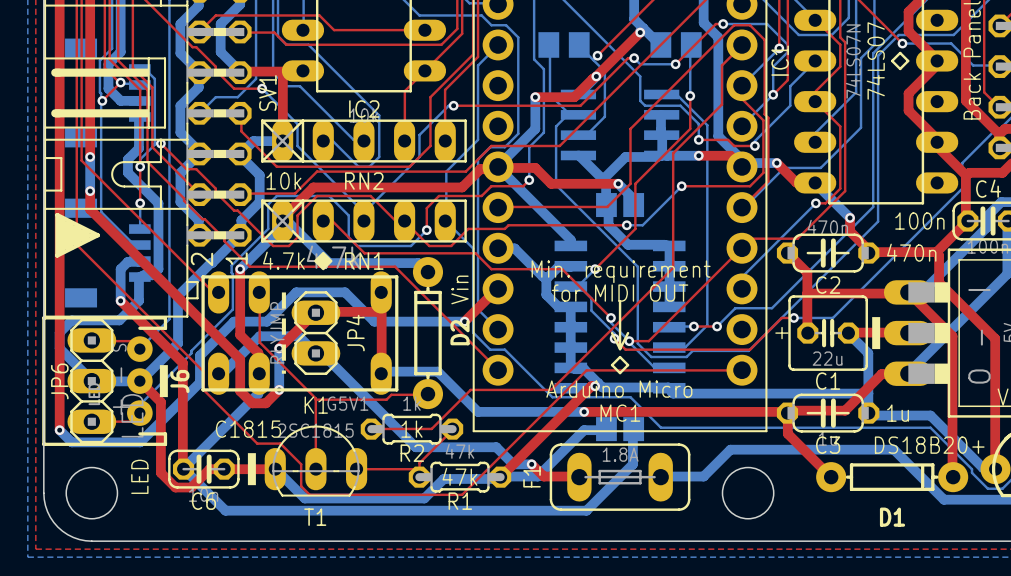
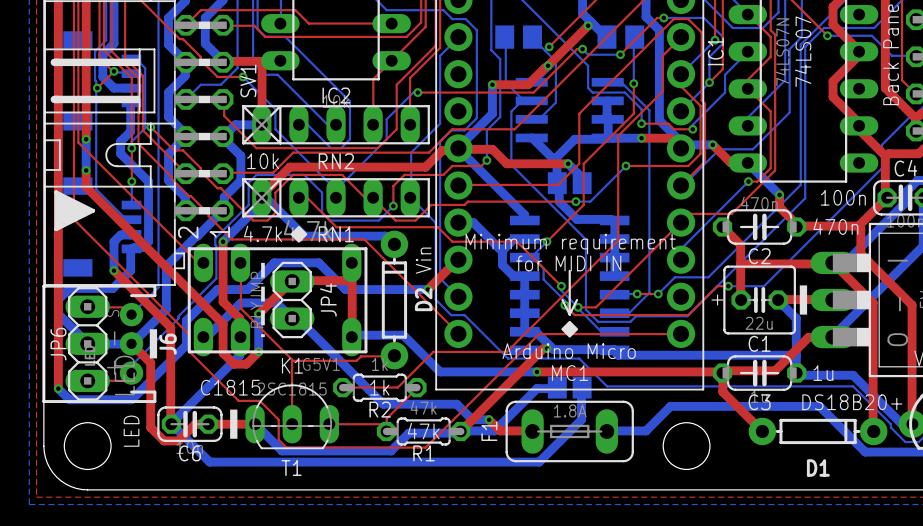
line: (900, 52) (892, 60) (900, 68) (908, 60) (900, 52) -> none
text: Min. requirement (621, 271) -> Minimum requirement (570, 244)
text: for MIDI OUT (620, 293) -> for MIDI IN (568, 263)
drawing: none -> [561, 320, 579, 338]
line: (620, 357) (612, 365) (620, 373) (628, 365) (620, 357) -> none

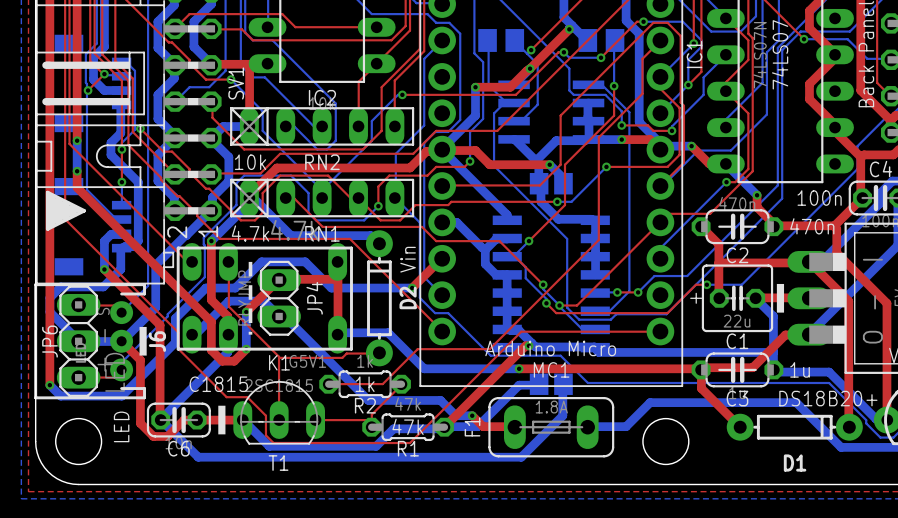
drawing: [290, 225, 308, 243] -> none
text: Minimum requirement (570, 244) -> none
text: for MIDI IN (568, 263) -> none
line: (569, 270) (569, 314) -> none
line: (562, 300) (569, 314) -> none
line: (577, 300) (569, 314) -> none
drawing: [561, 320, 579, 338] -> none

